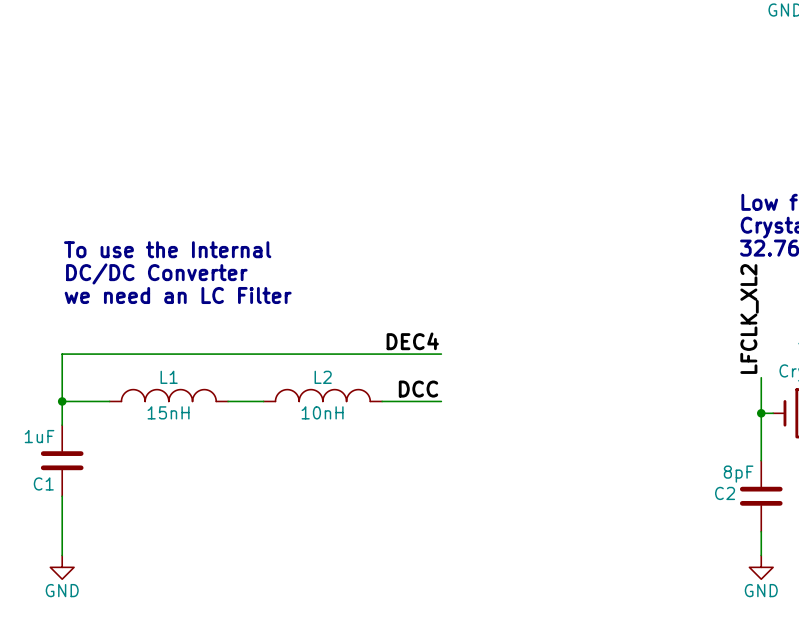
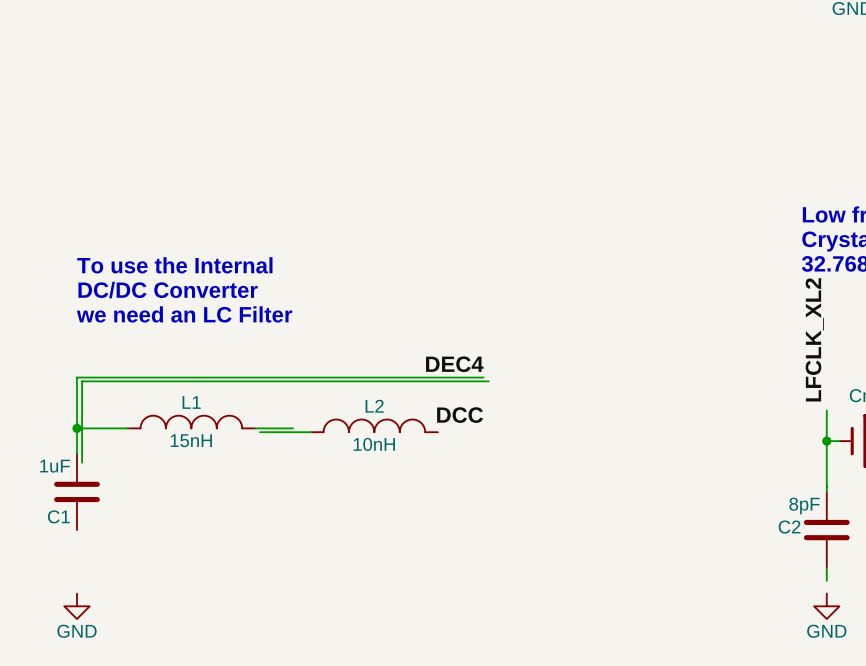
wire: none -> (488, 381) (82, 381) (82, 462)
wire: (761, 377) (761, 384) -> none
L2 position: (322, 395) -> (374, 425)
wire: (382, 401) (441, 401) -> none
wire: none -> (259, 432) (310, 432)
wire: (62, 496) (62, 555) -> none
wire: (761, 543) (761, 555) -> none

